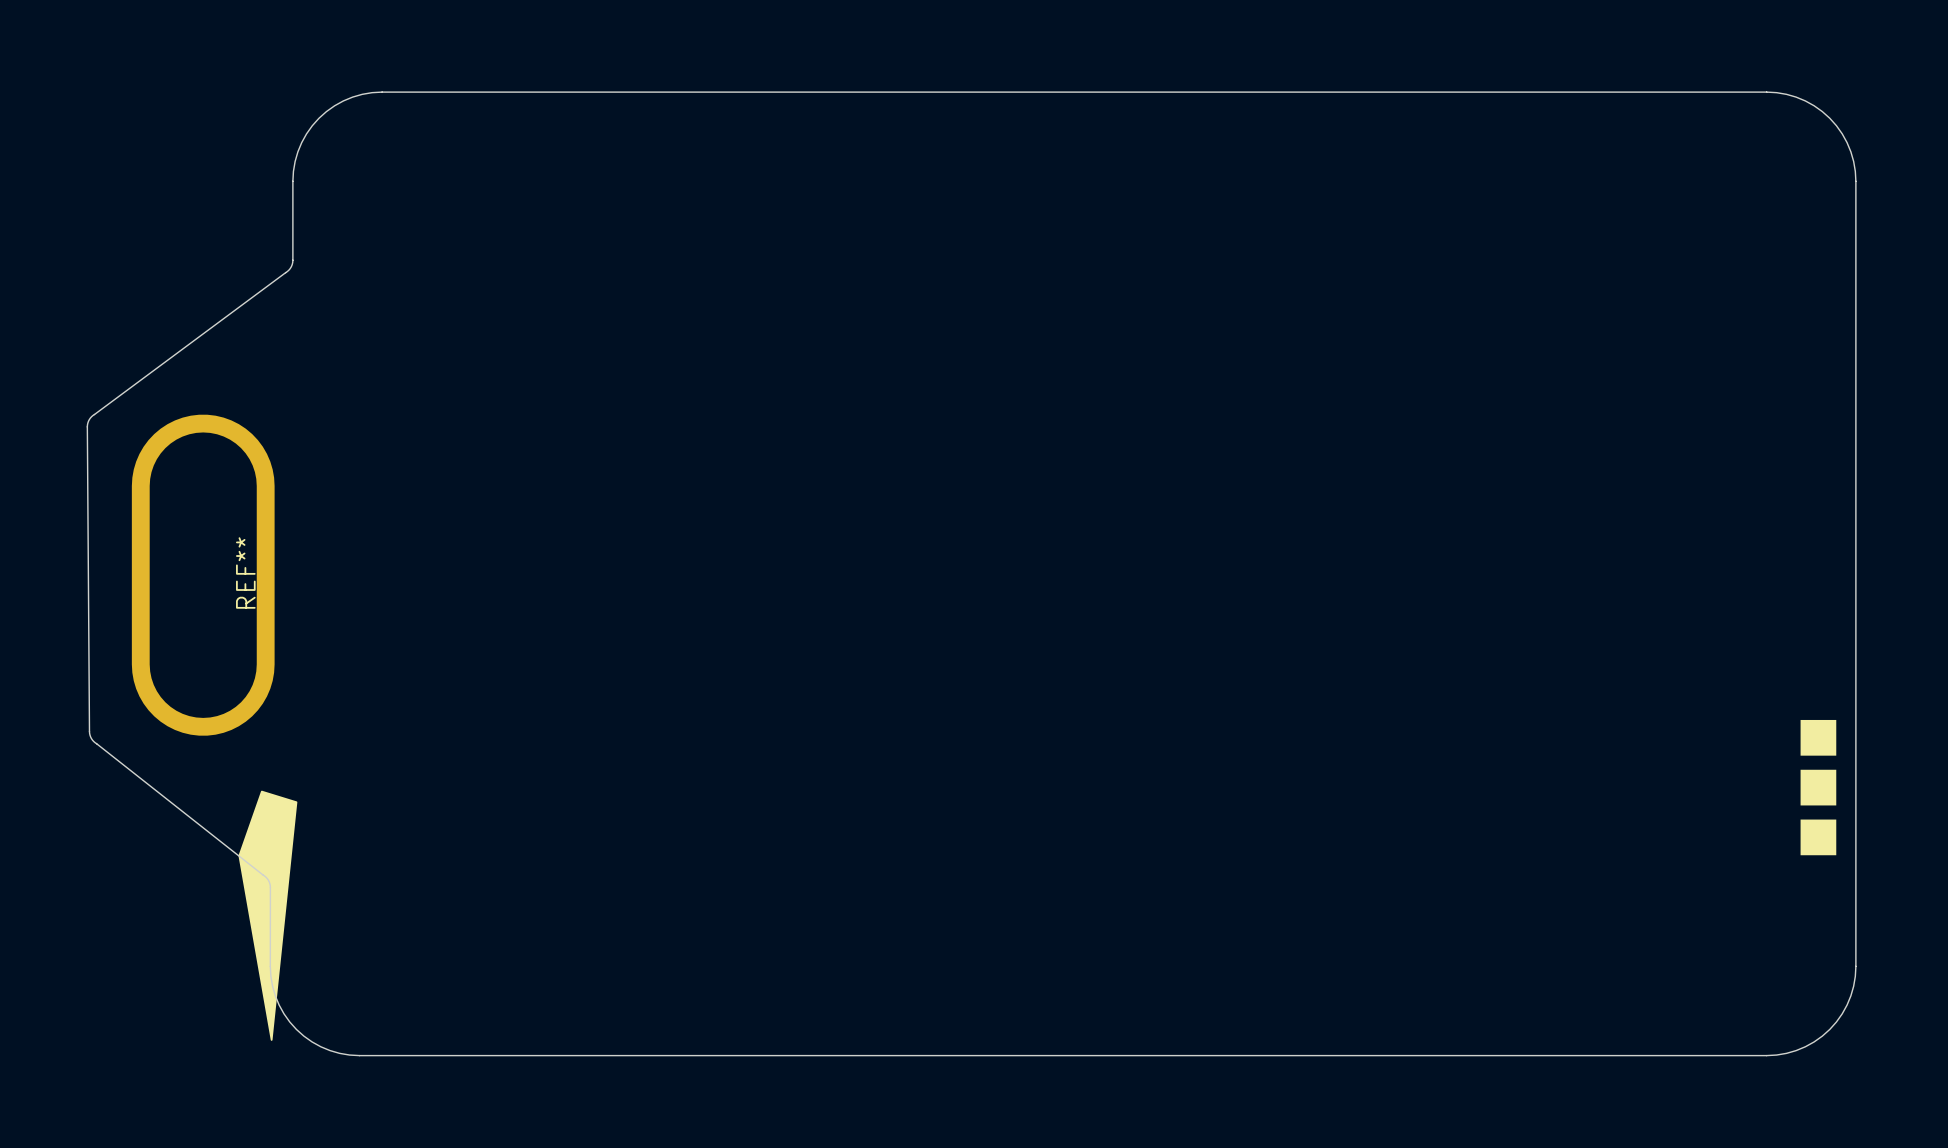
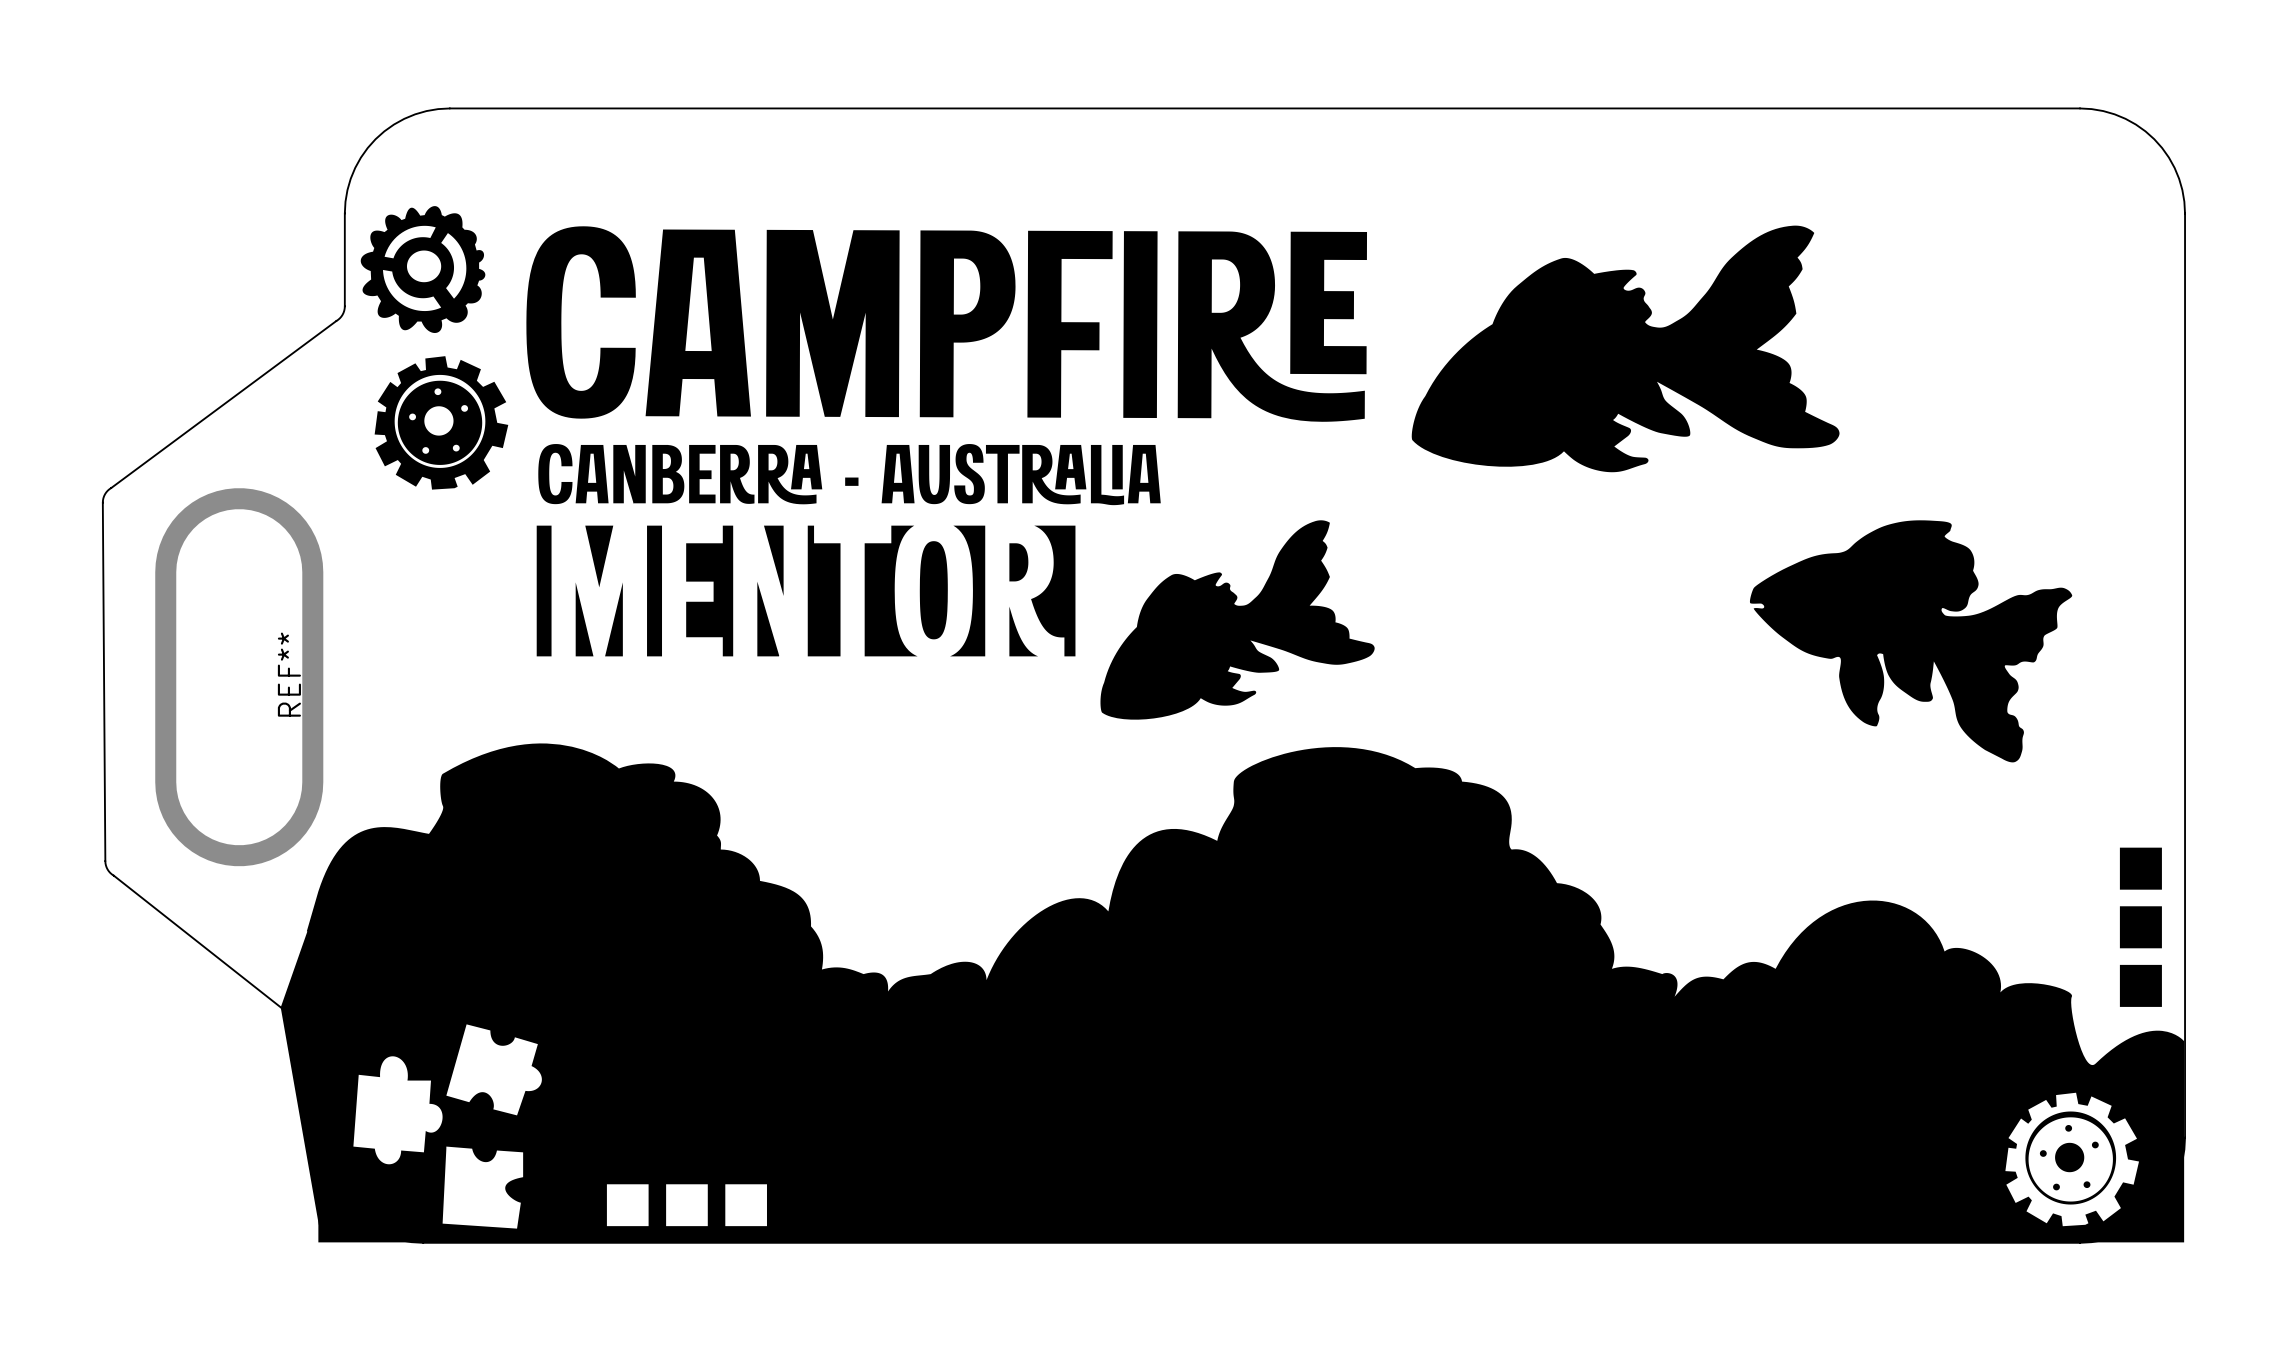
drawing: none -> [360, 206, 1368, 490]
drawing: none -> [1411, 225, 1840, 473]
drawing: none -> [306, 444, 2185, 1243]

